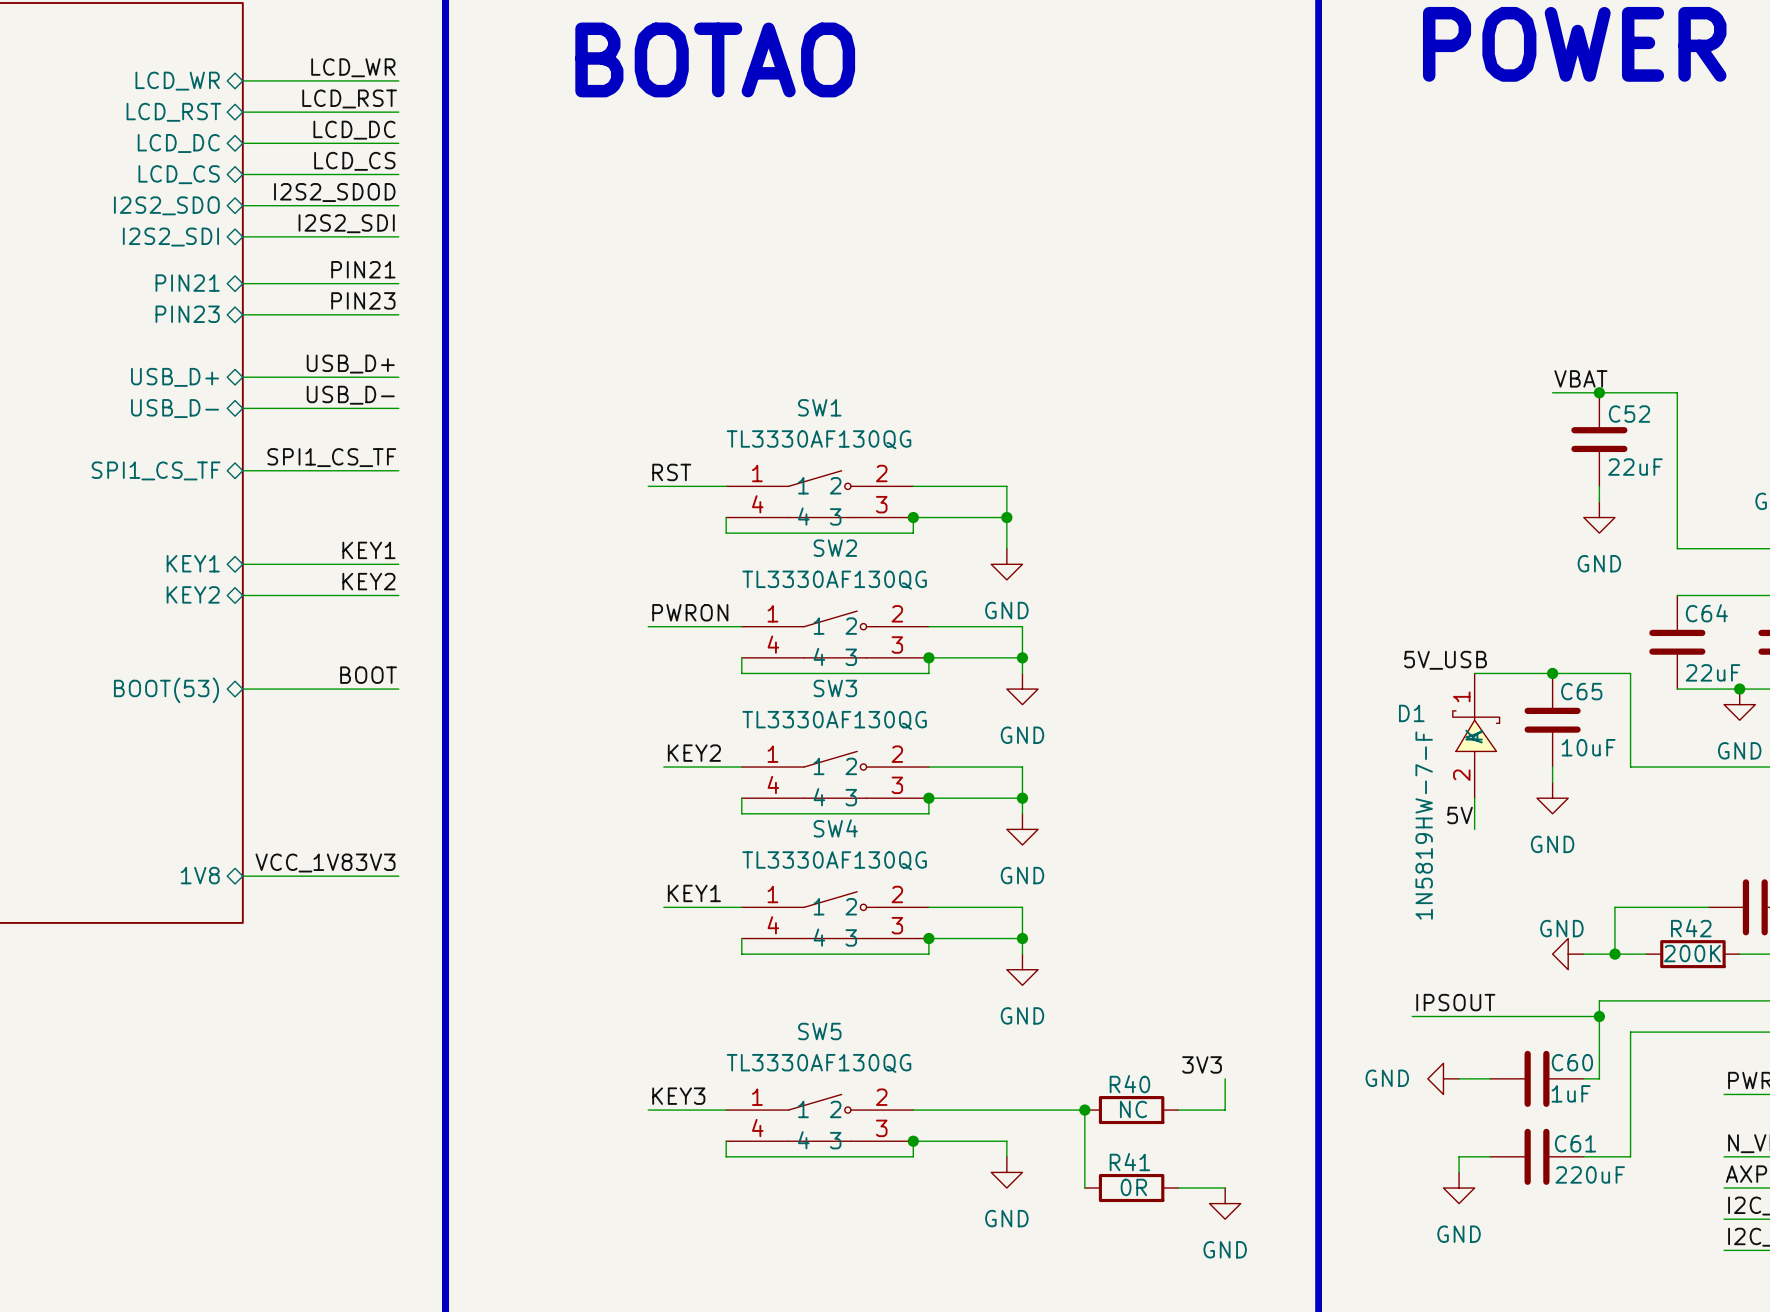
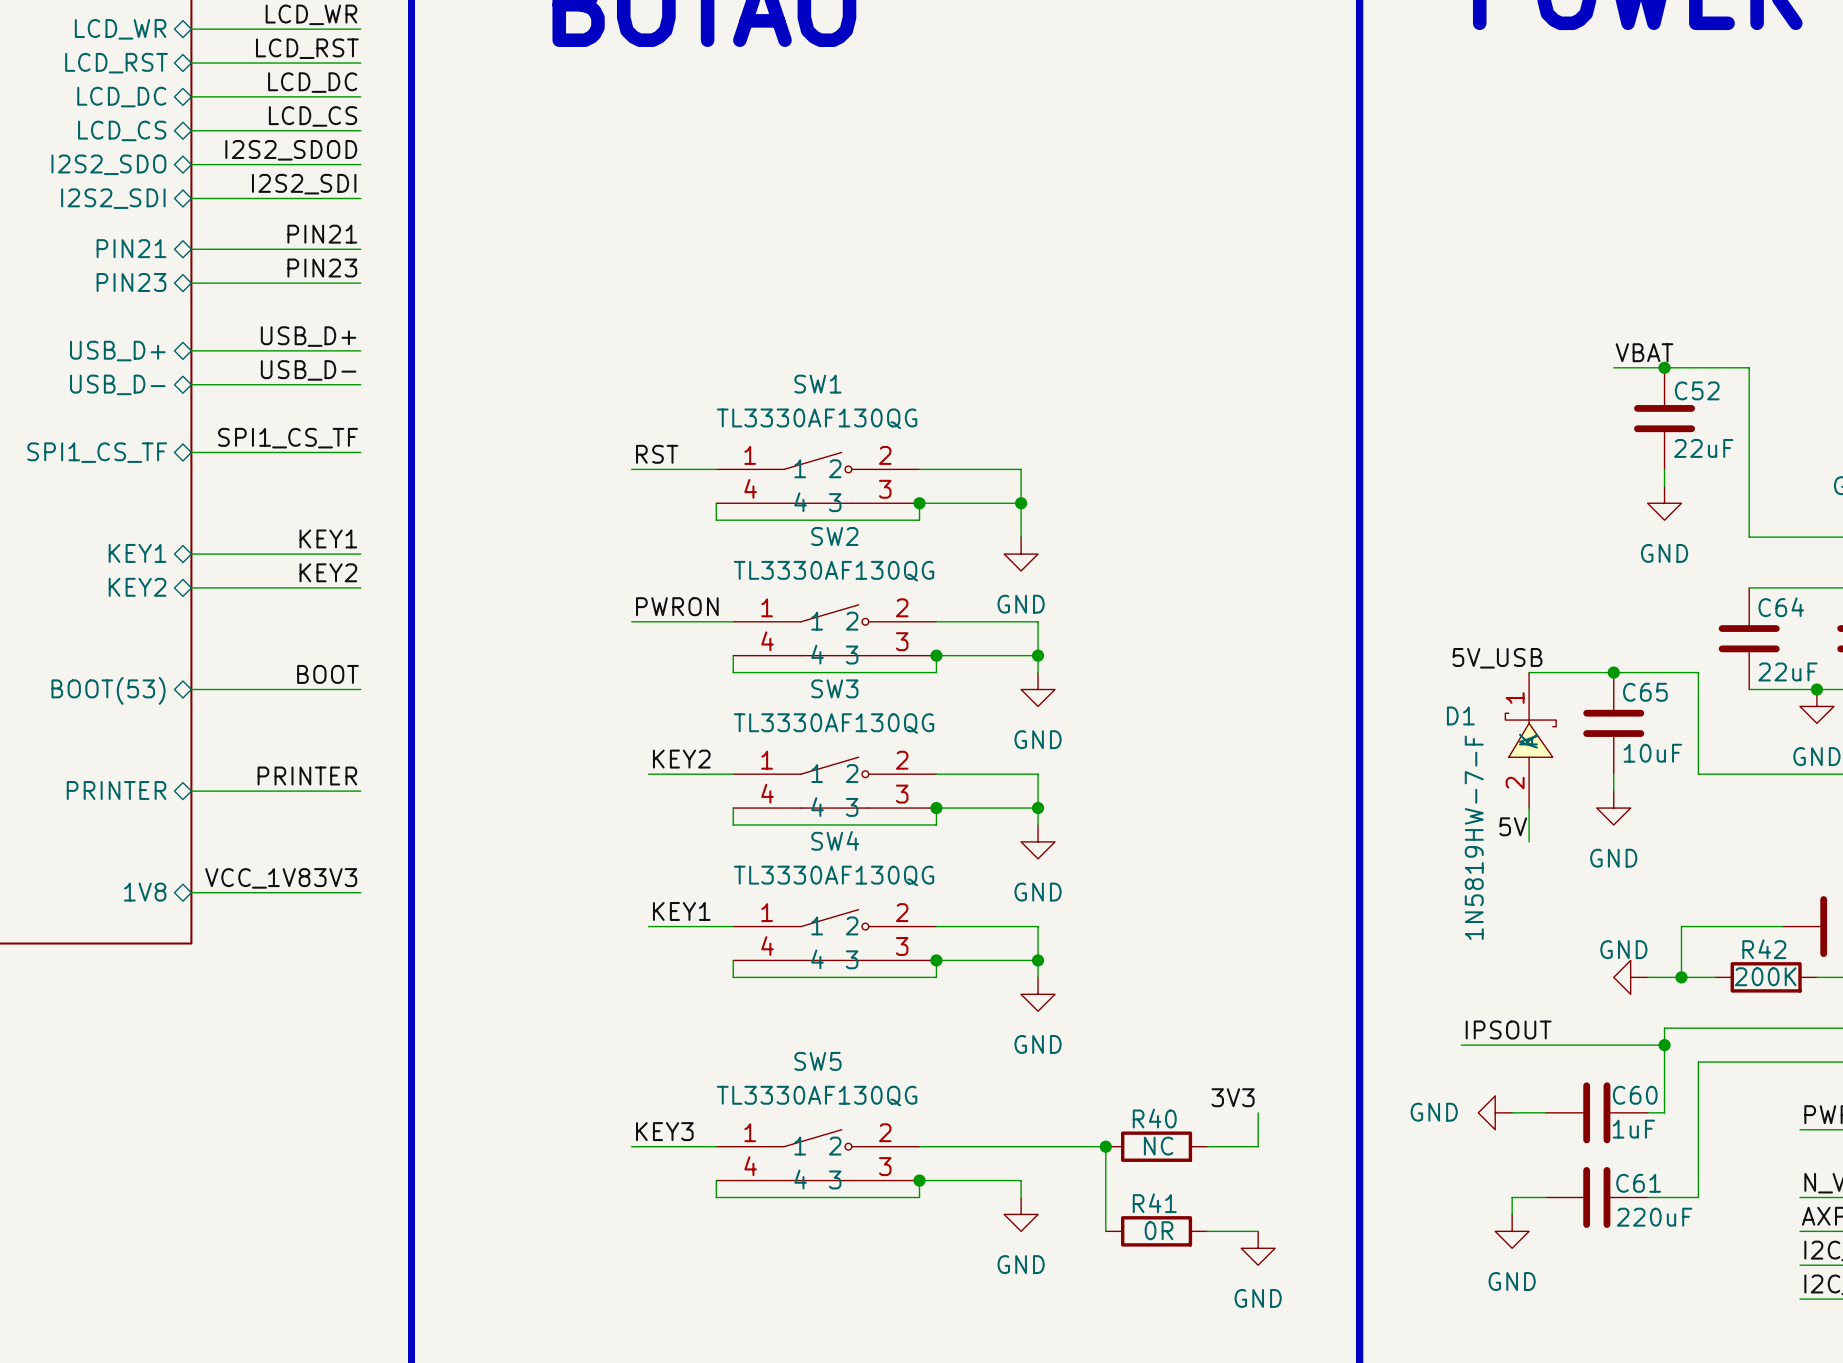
label: none -> PRINTER (307, 776)
sheet pin: none -> PRINTER (116, 790)
wire: none -> (191, 791) (360, 791)

